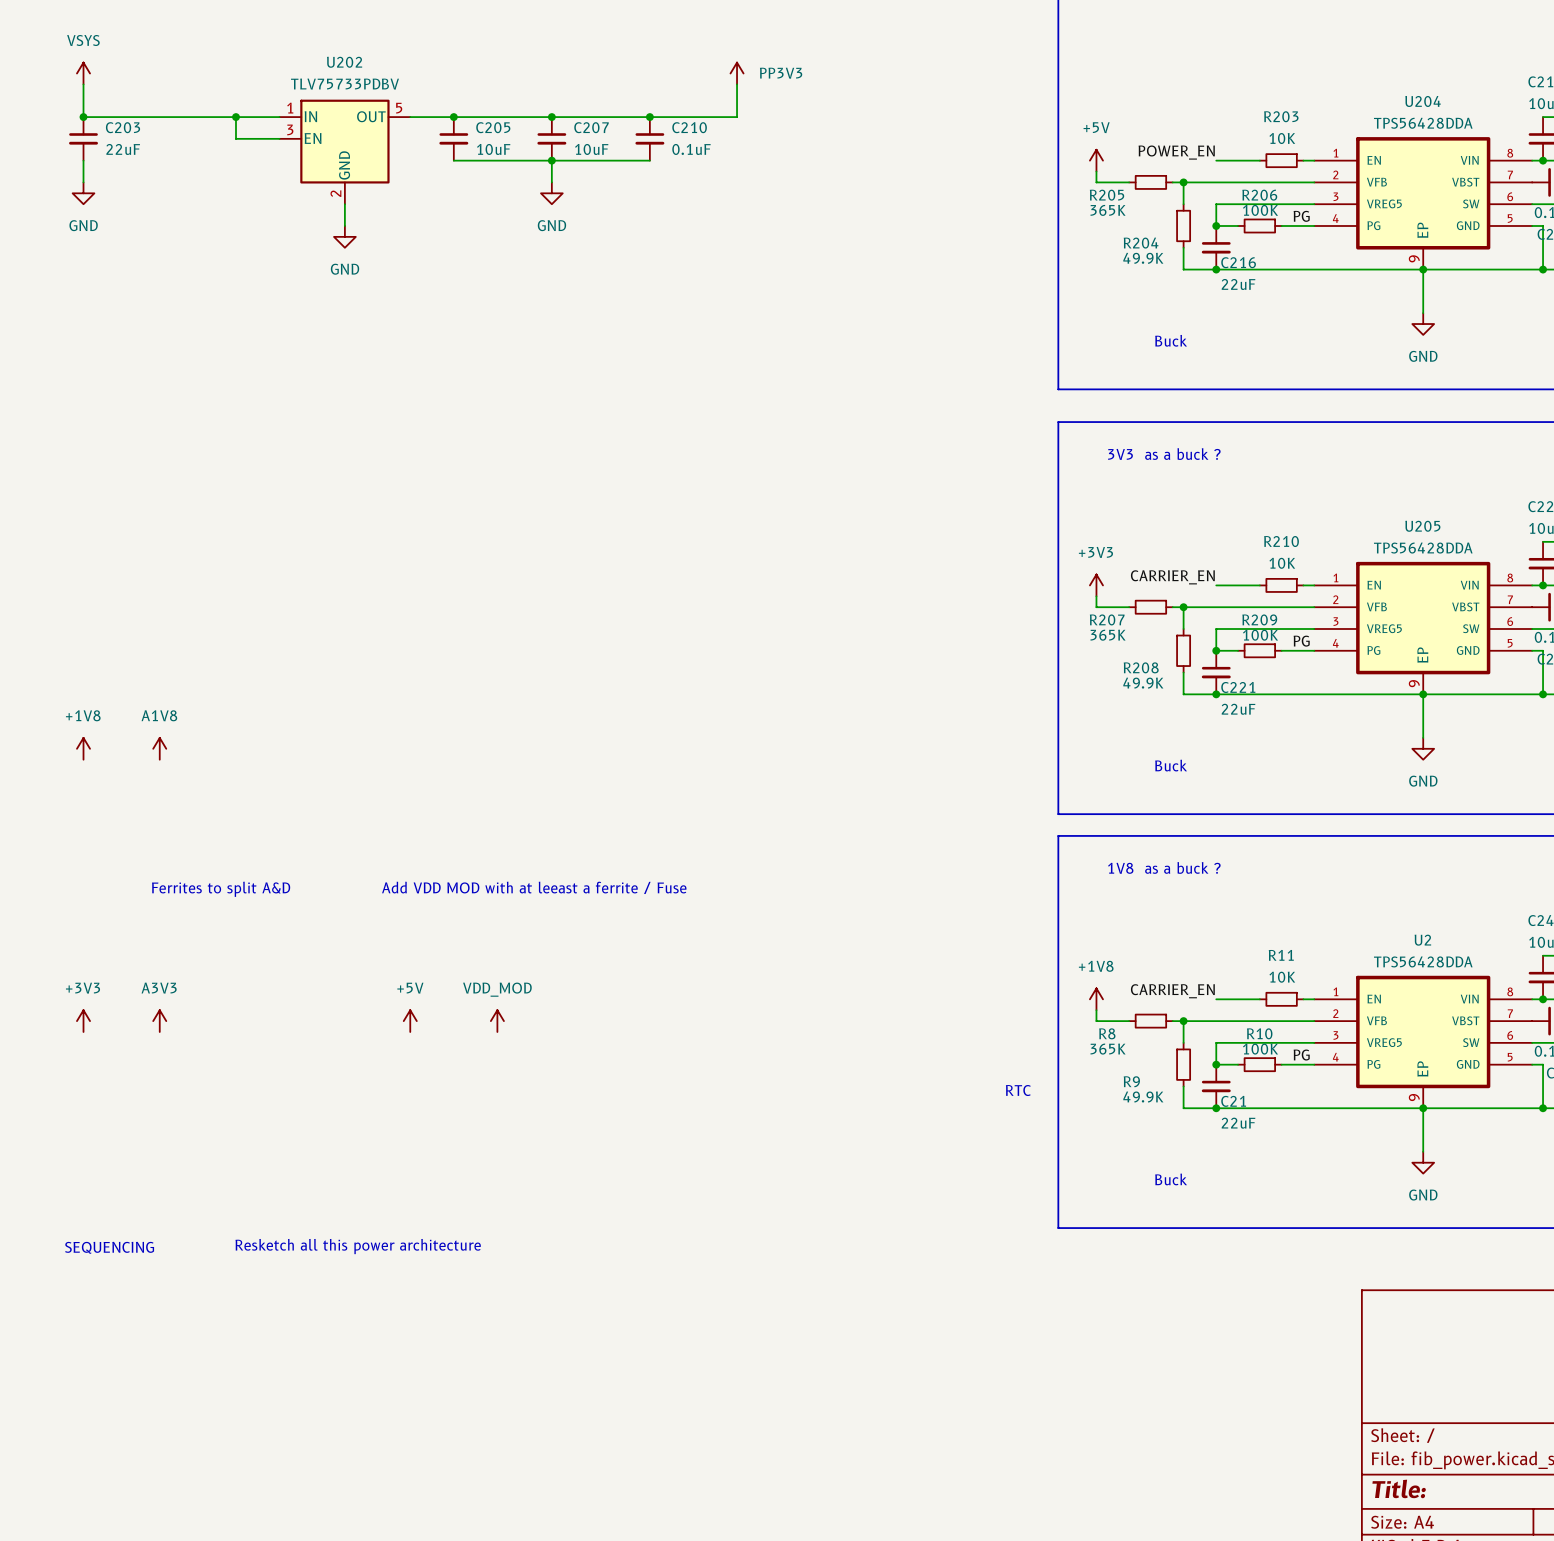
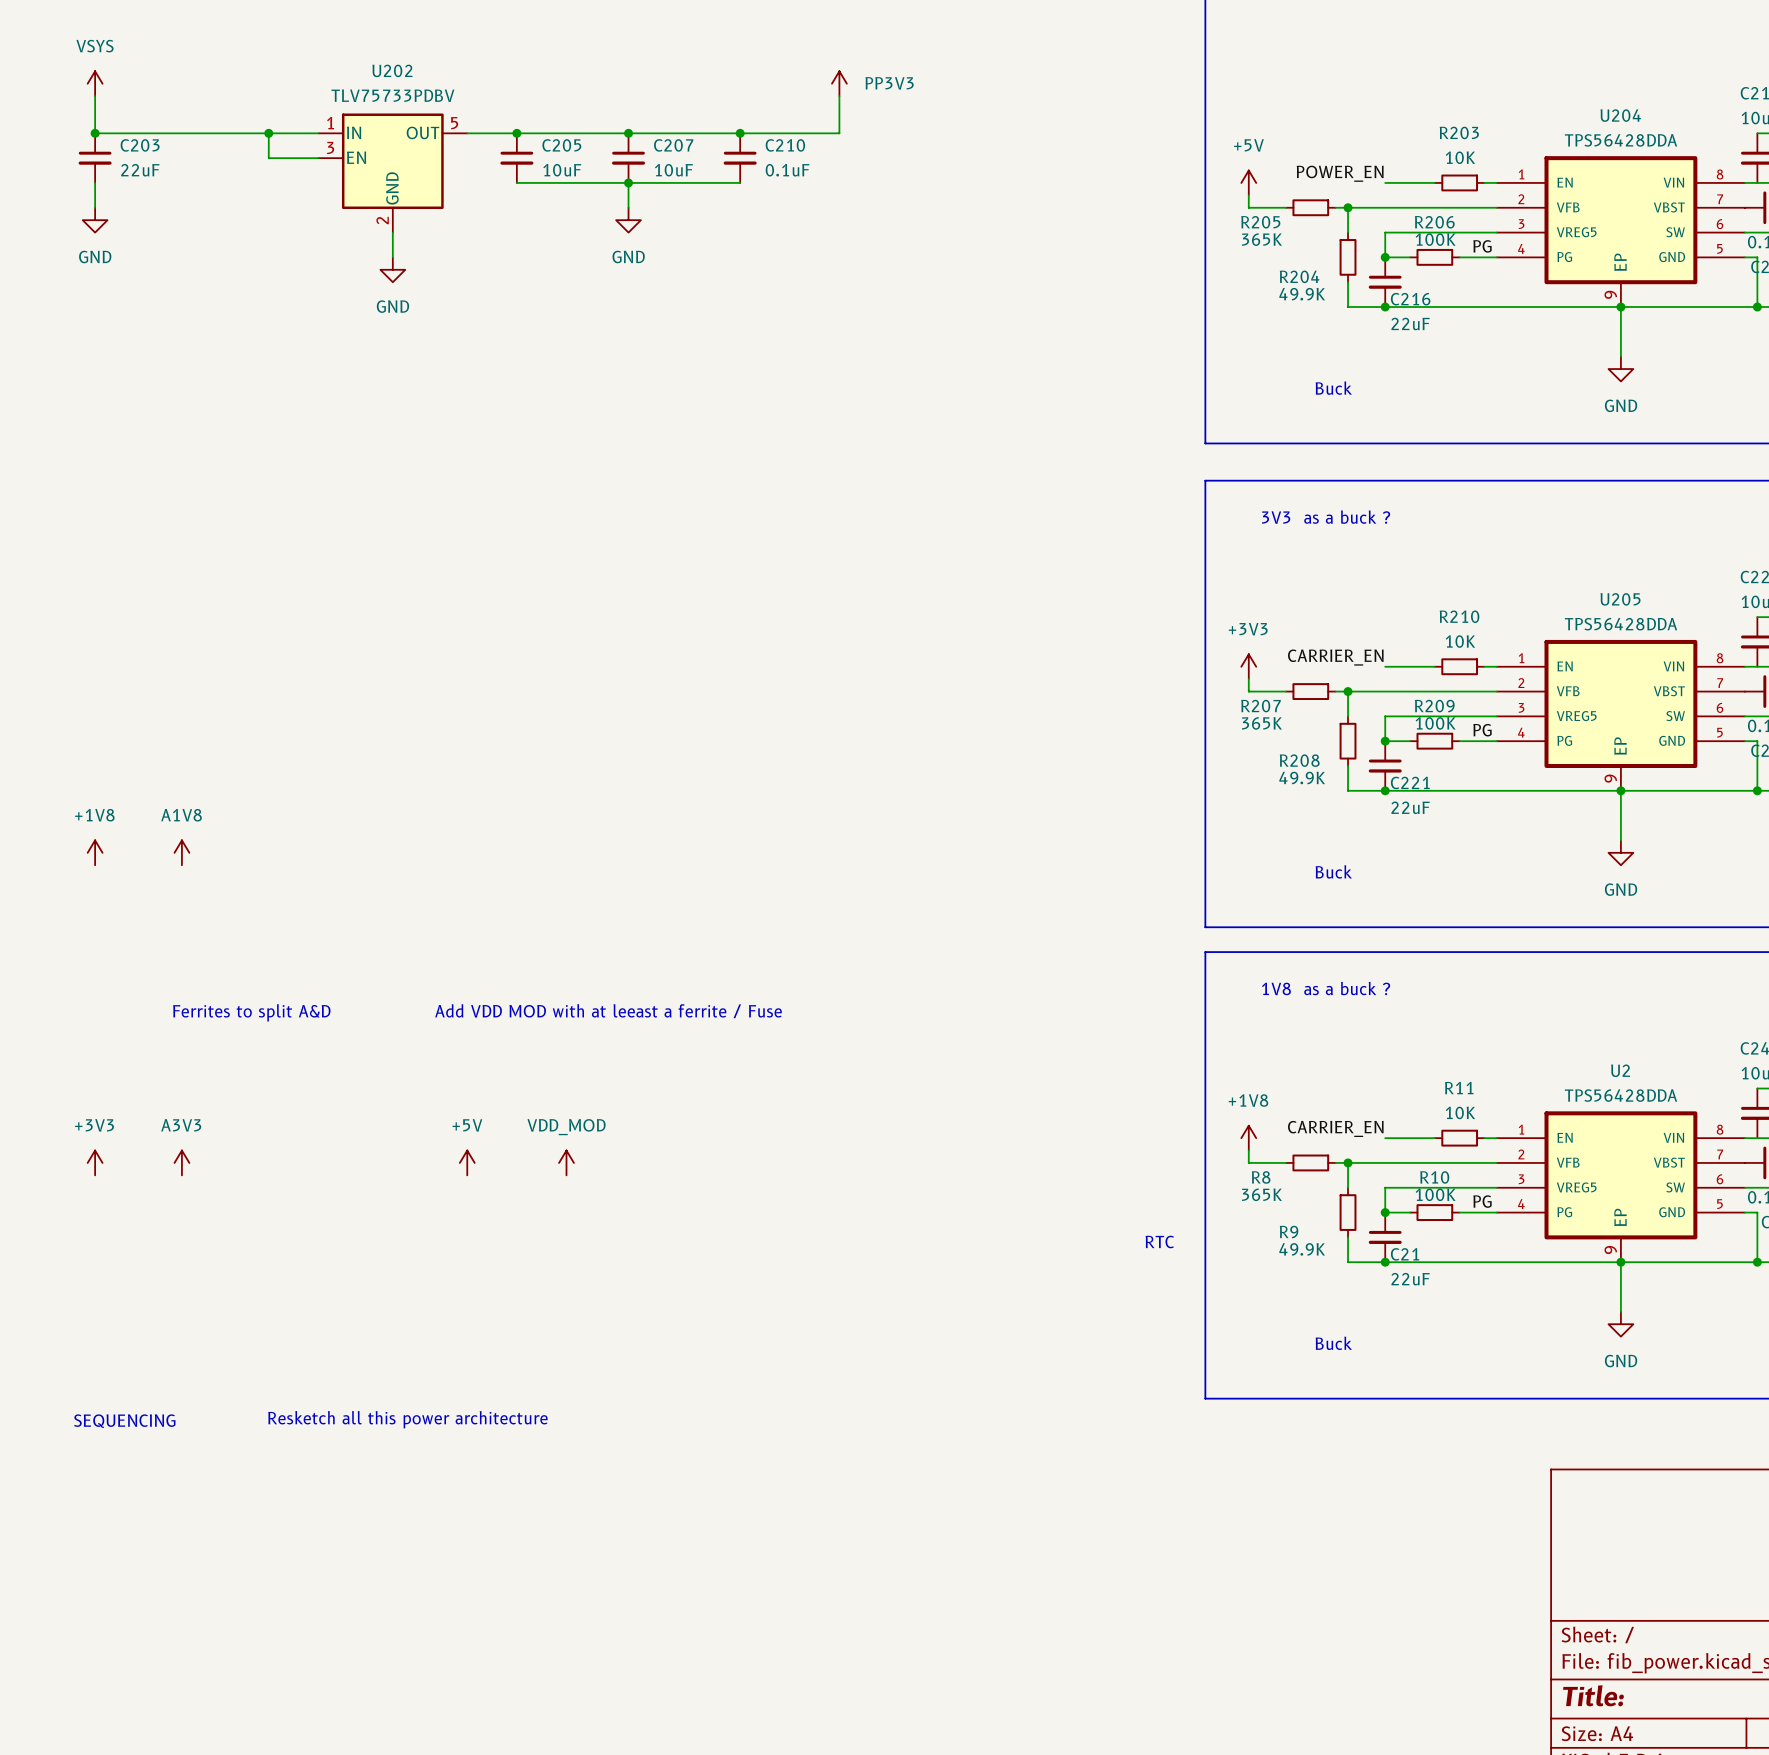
junction: (1543, 160) -> none
junction: (1543, 585) -> none
junction: (1543, 999) -> none

